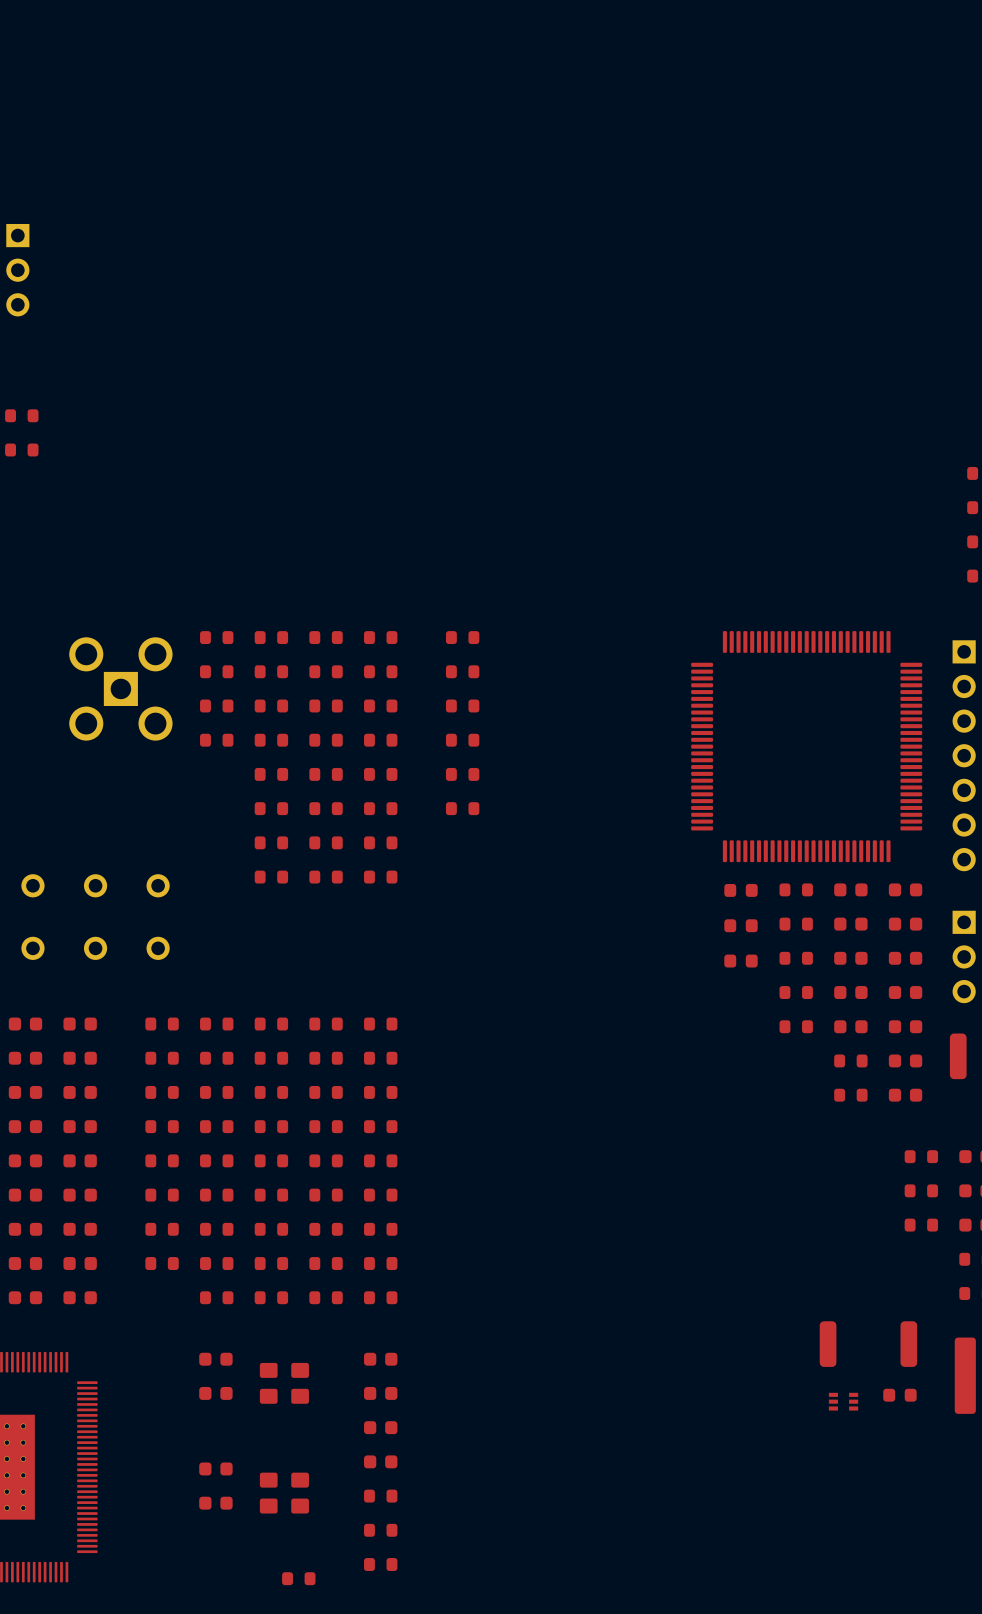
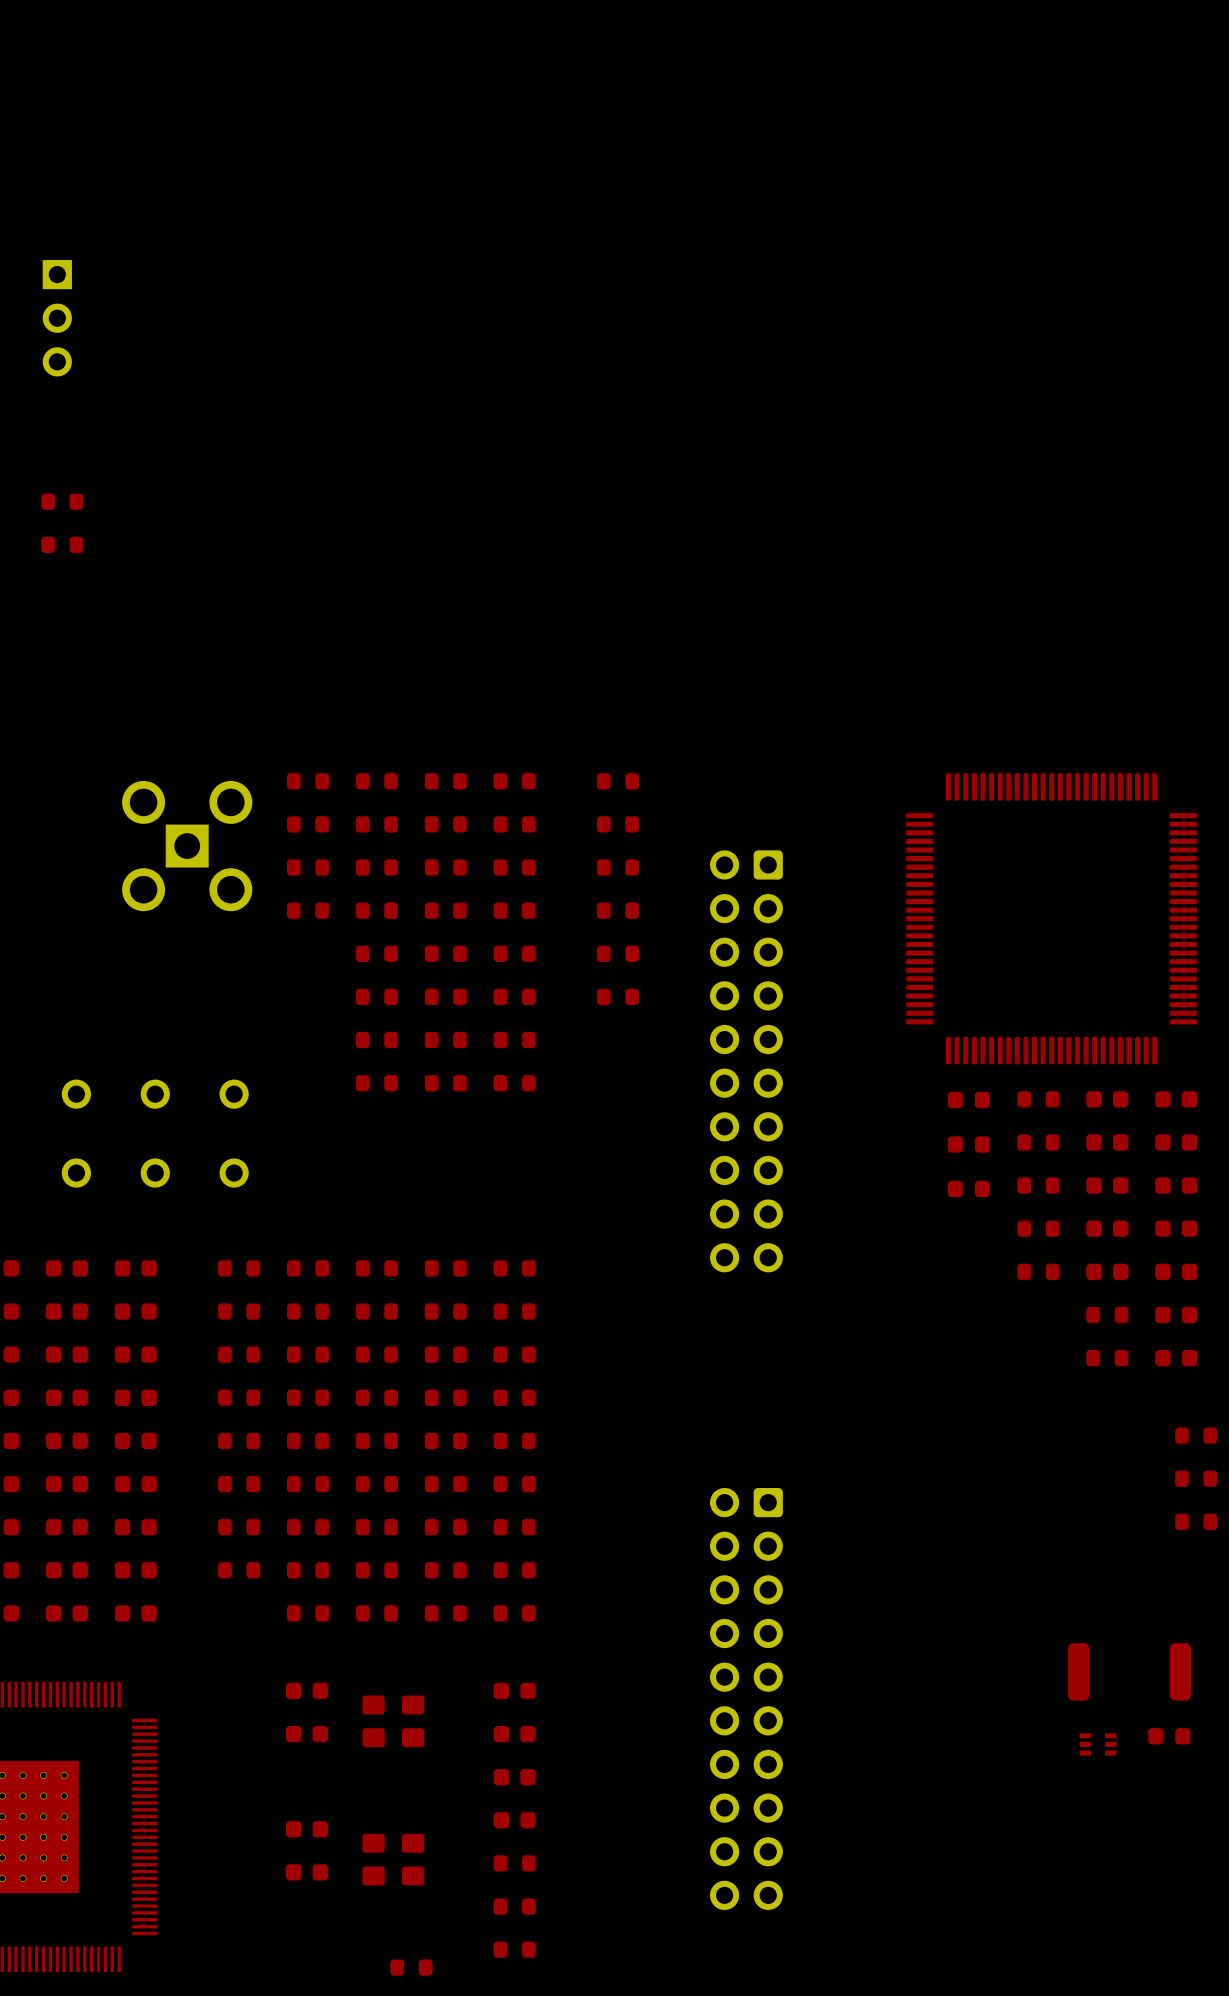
part: none -> (746, 1061)
part: none -> (746, 1698)

